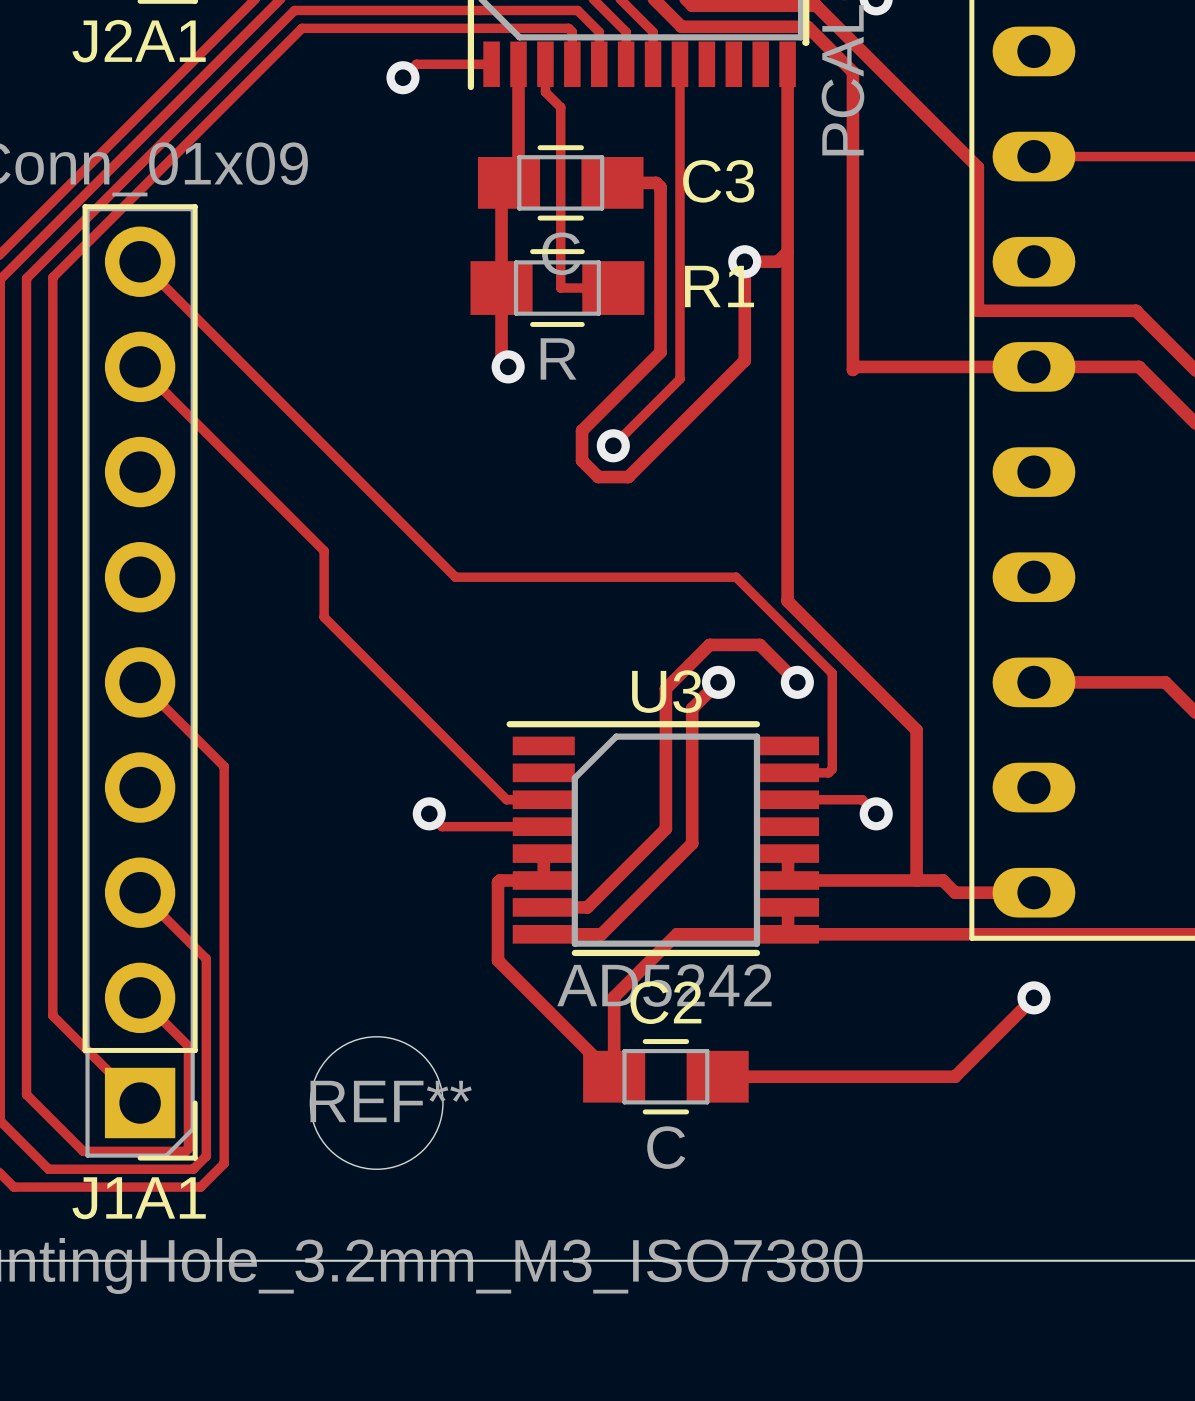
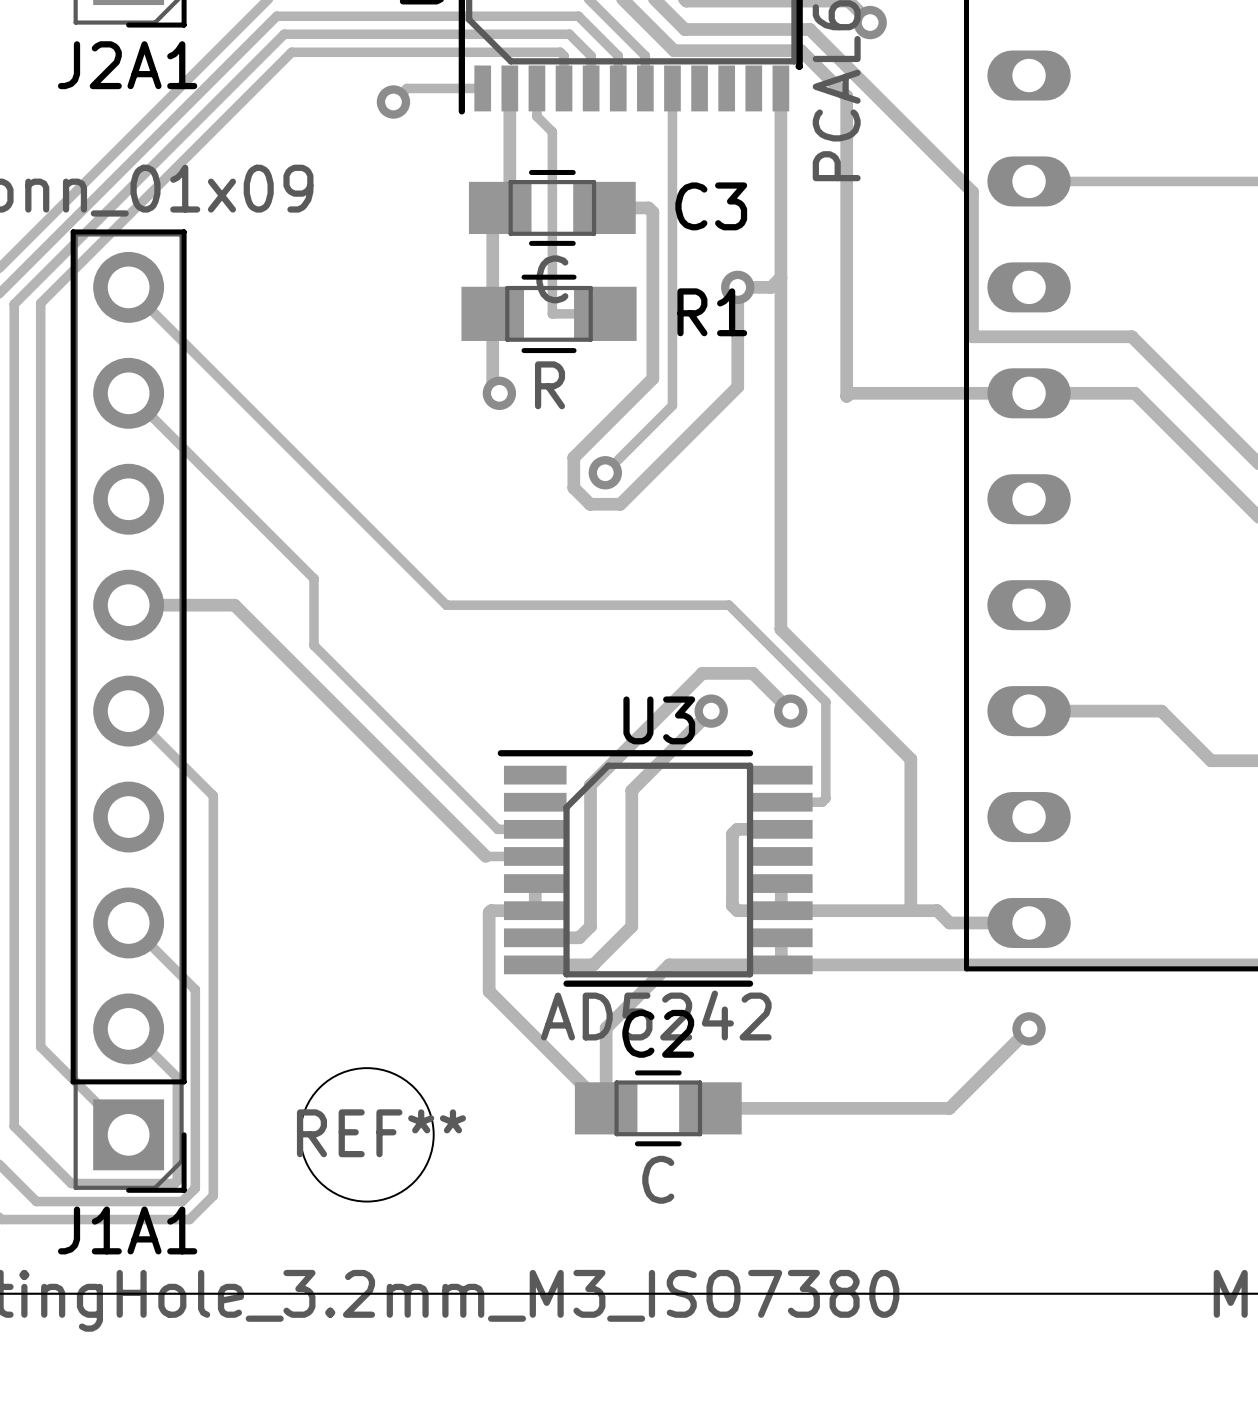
track: (665, 688) (665, 828) (598, 896) -> (658, 717) (590, 785) (590, 926)
track: (692, 708) (692, 843) (639, 896) -> (684, 737) (631, 790) (631, 926)
track: (788, 799) (862, 799) (876, 813) -> (781, 829) (737, 829) (732, 834) (732, 905) (737, 910) (781, 910)
track: (429, 813) (442, 826) (494, 826) -> (128, 605) (234, 605) (485, 856)
via: (429, 813) -> none
via: (876, 813) -> none

